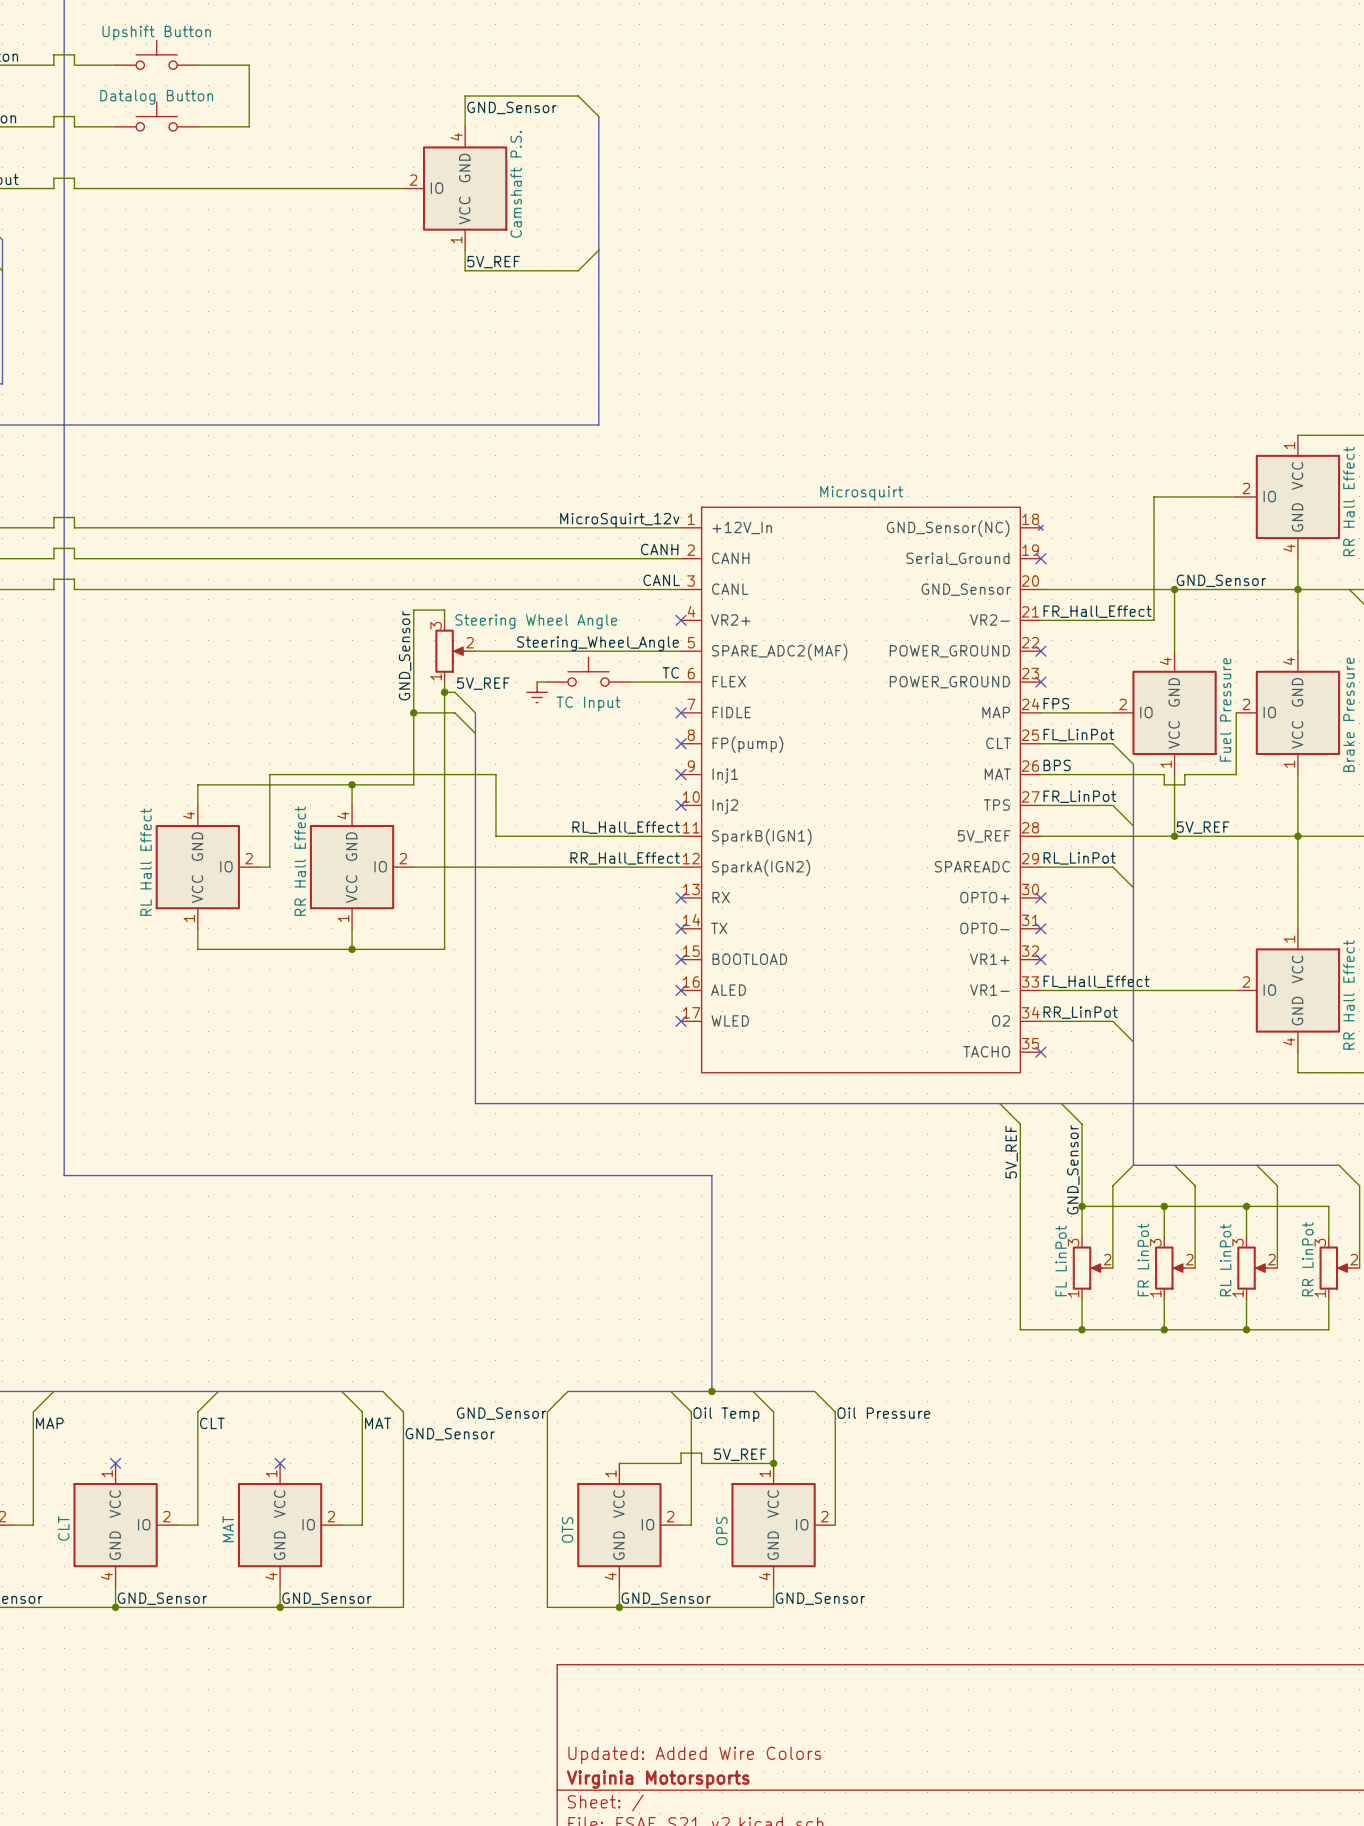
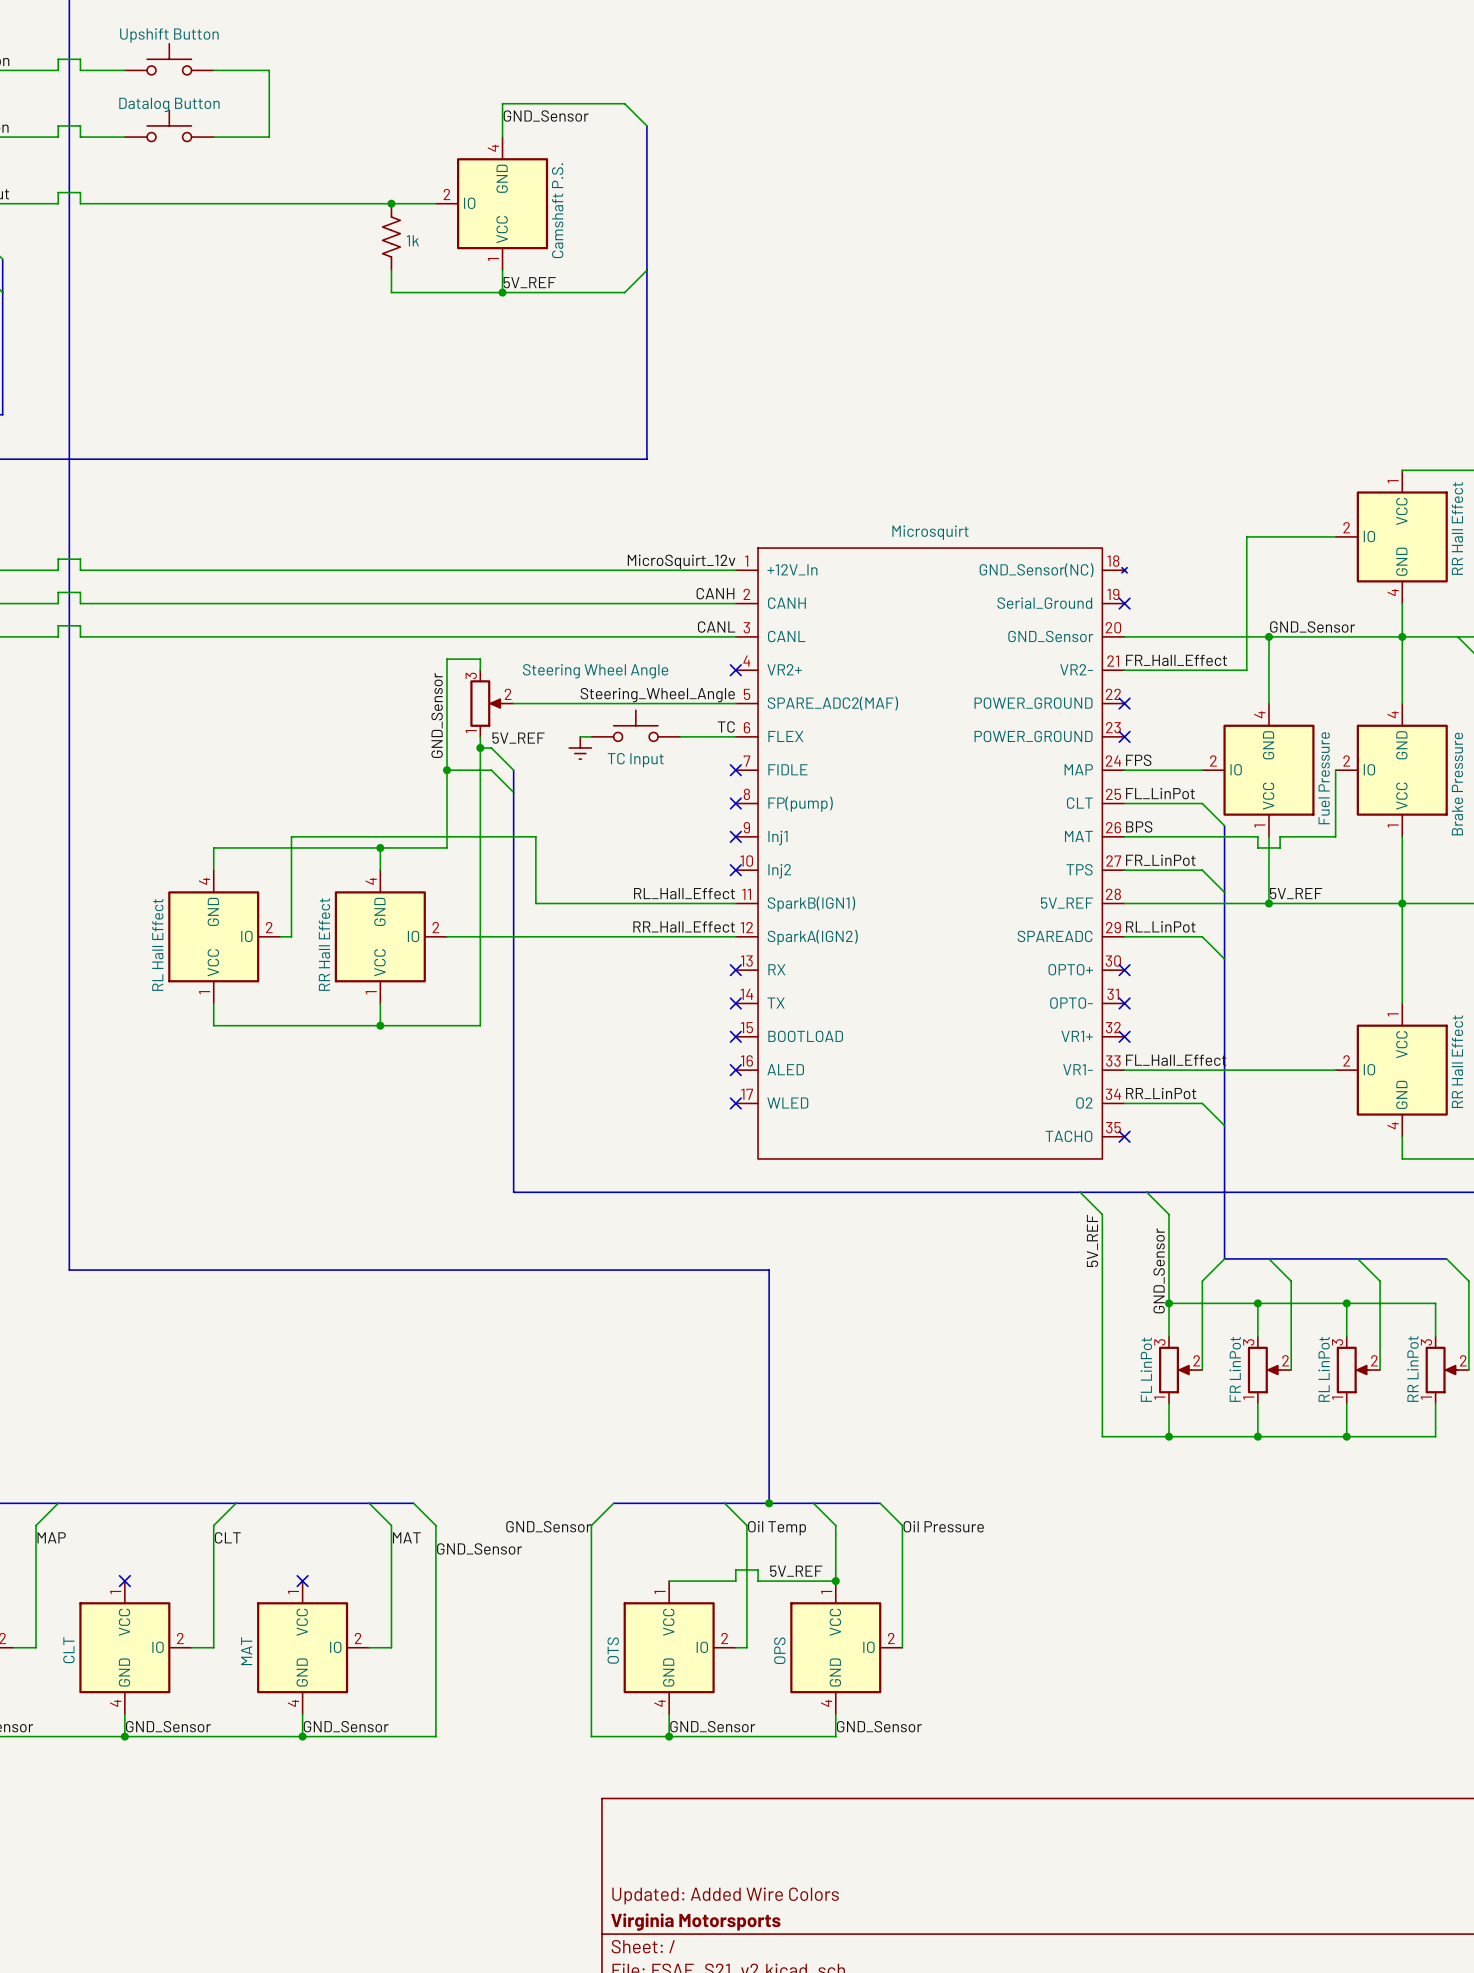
junction: none -> (391, 203)
part: none -> 1k (391, 237)
wire: none -> (391, 270) (391, 292) (502, 292)
junction: none -> (502, 292)

